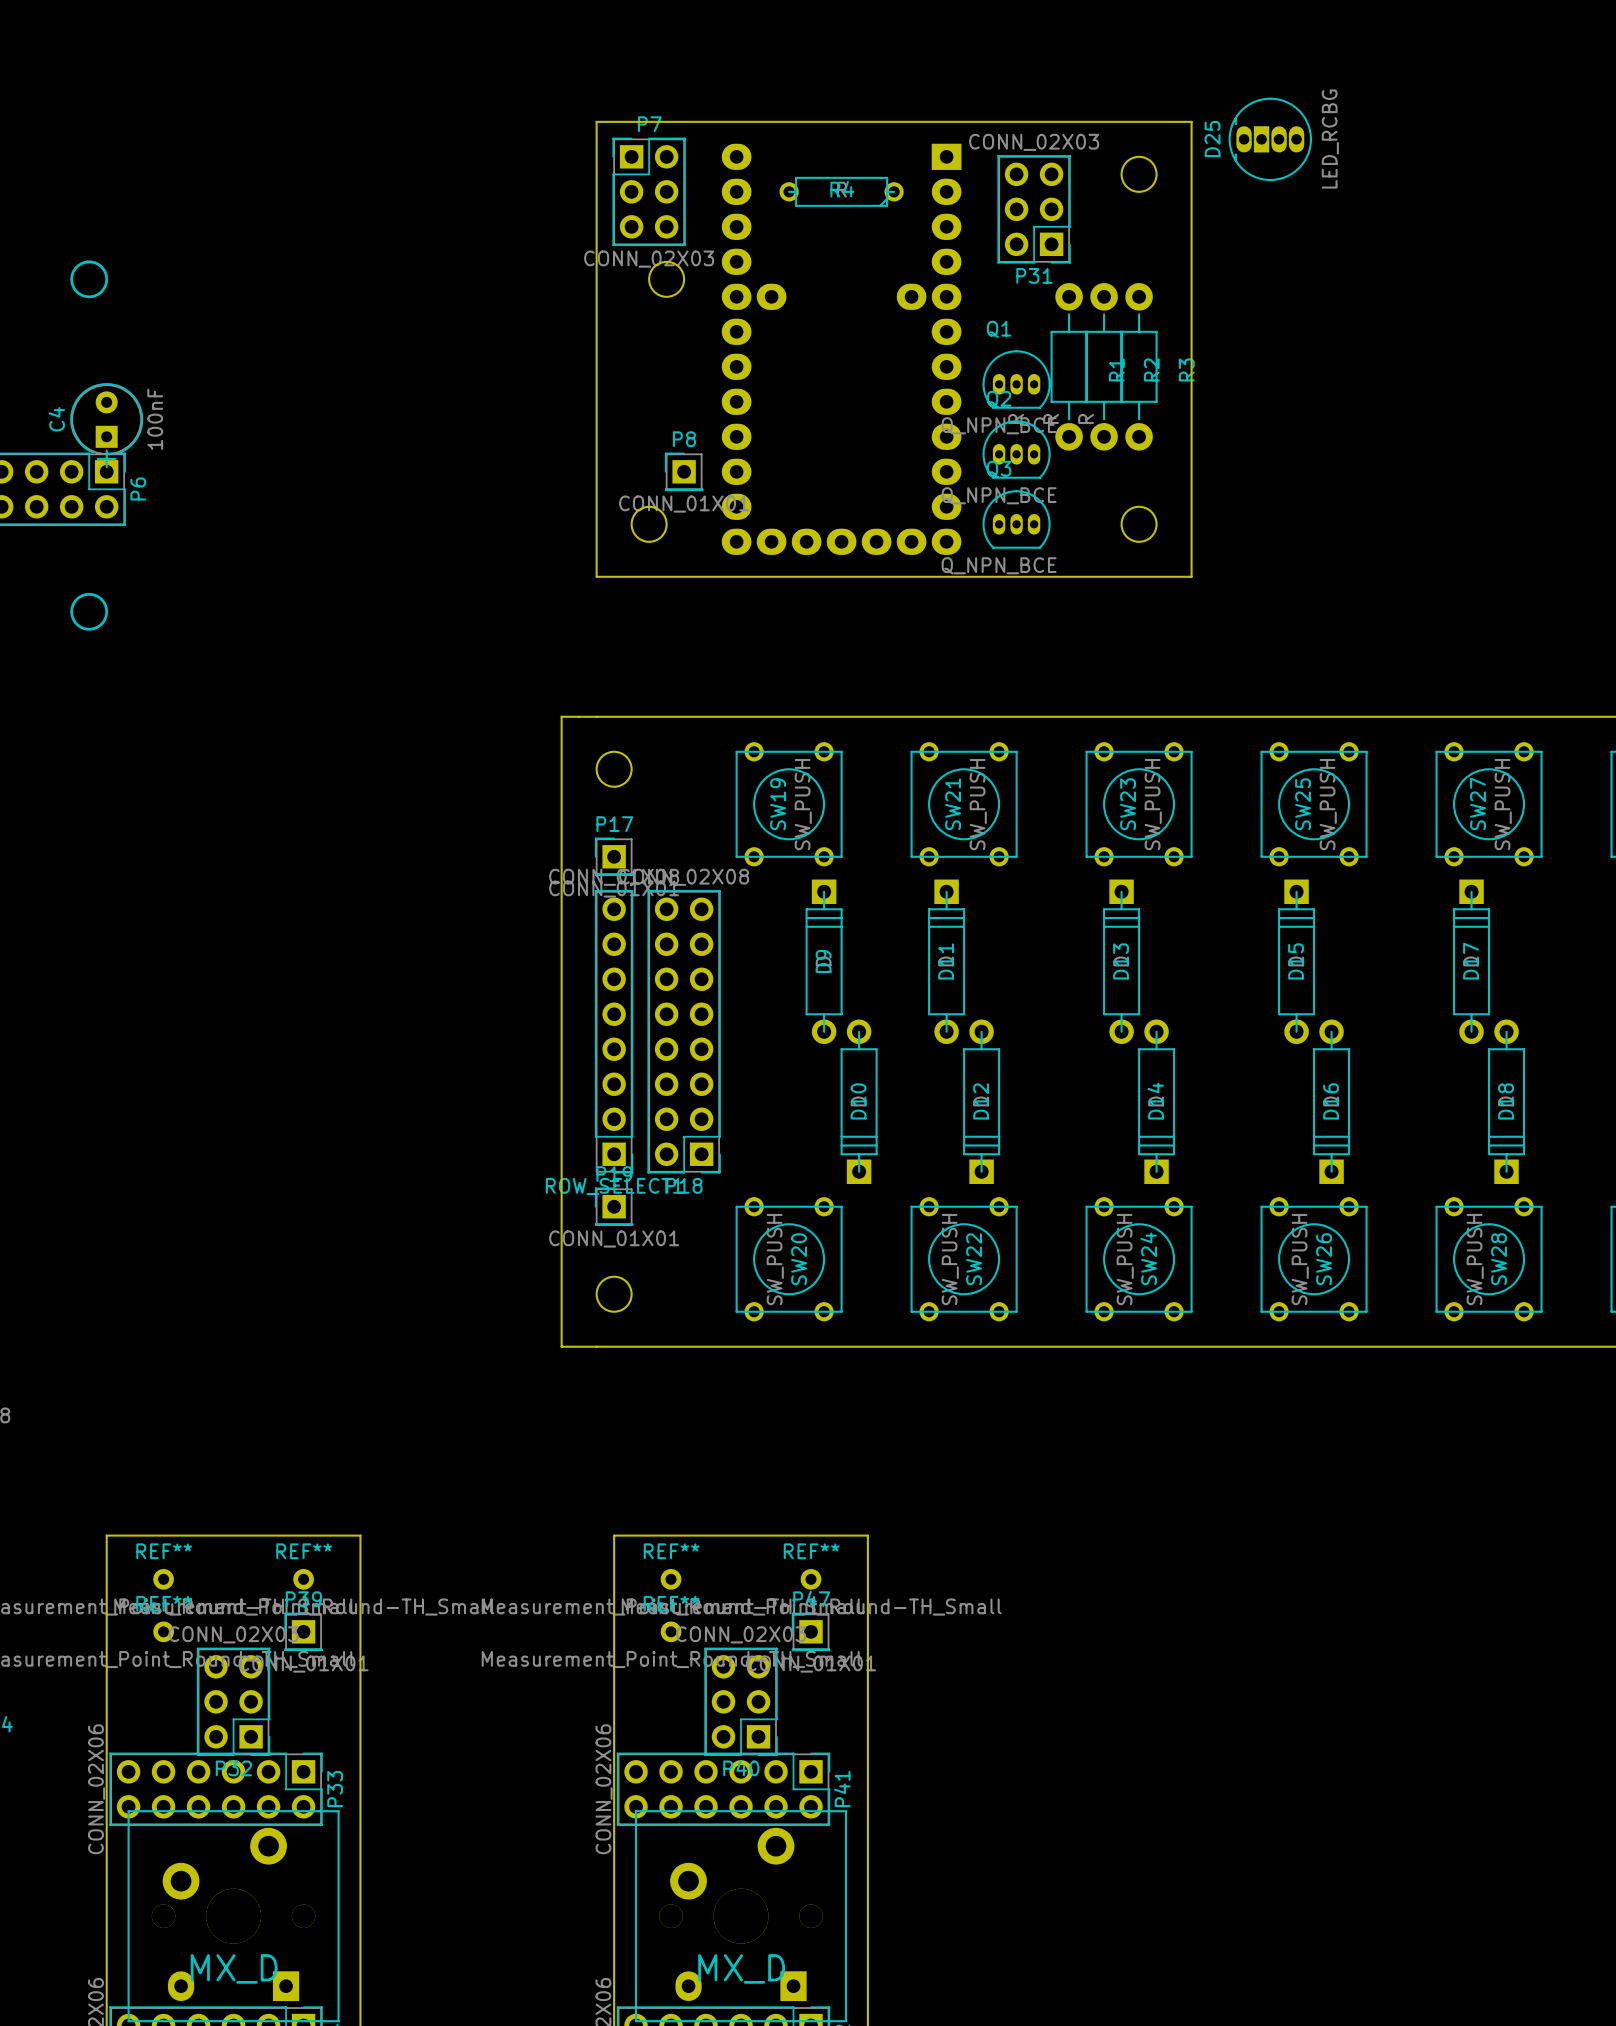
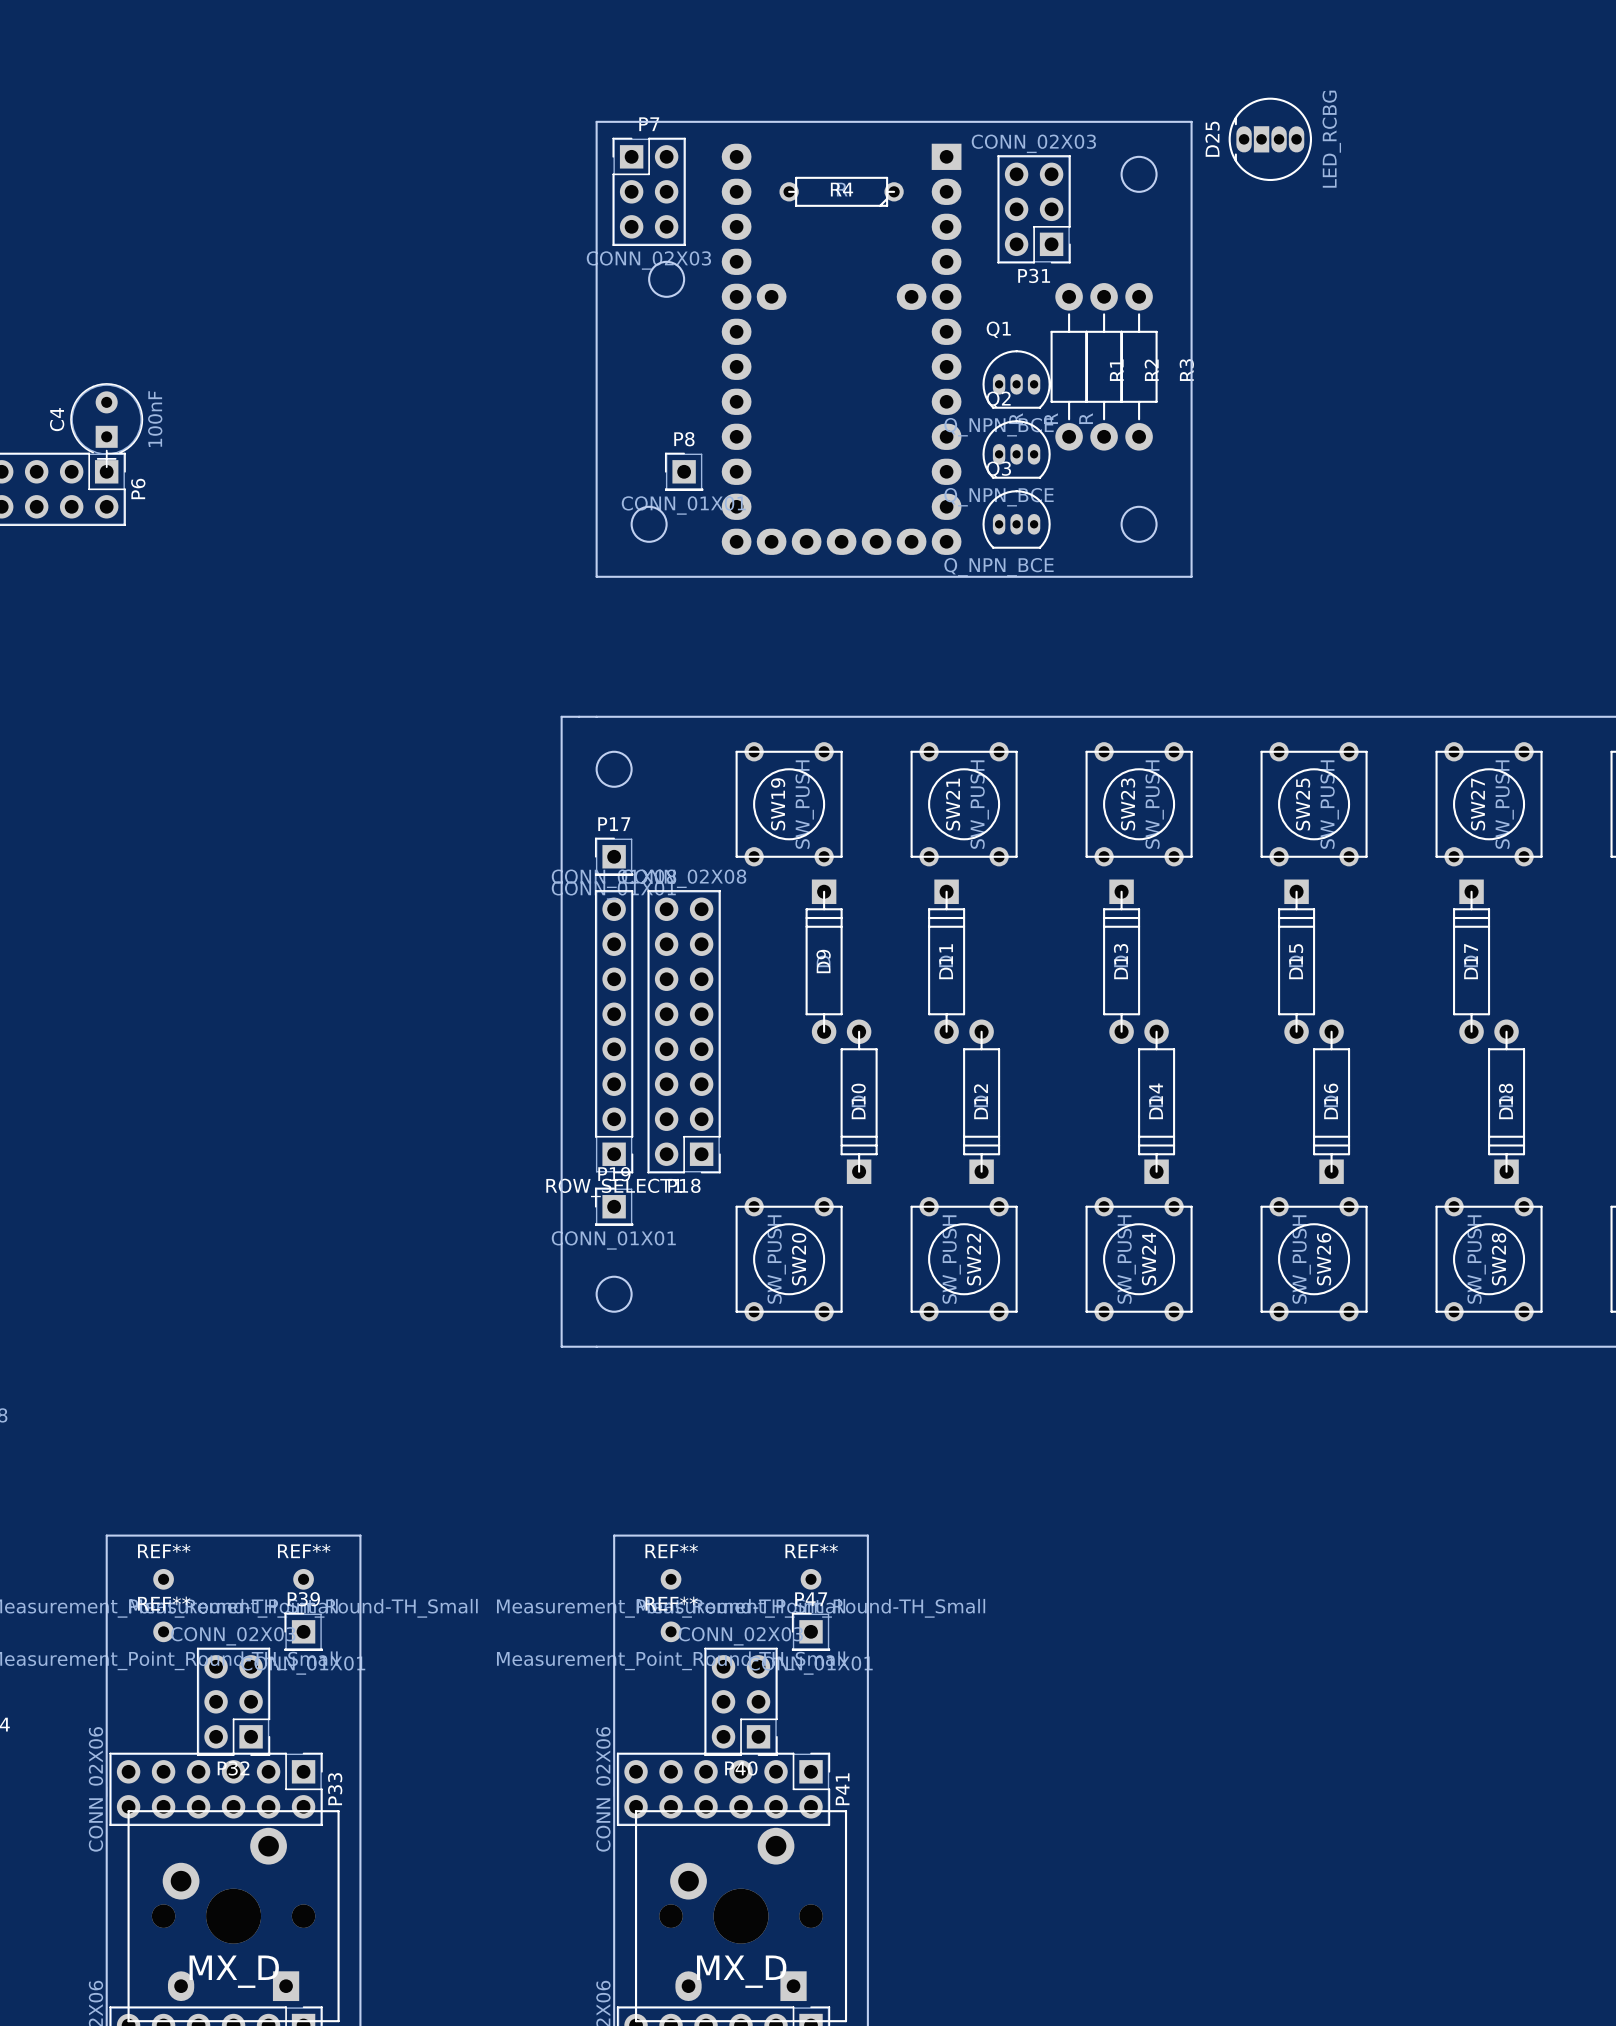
drawing: [70, 260, 109, 299] -> none
drawing: [70, 592, 109, 631] -> none

